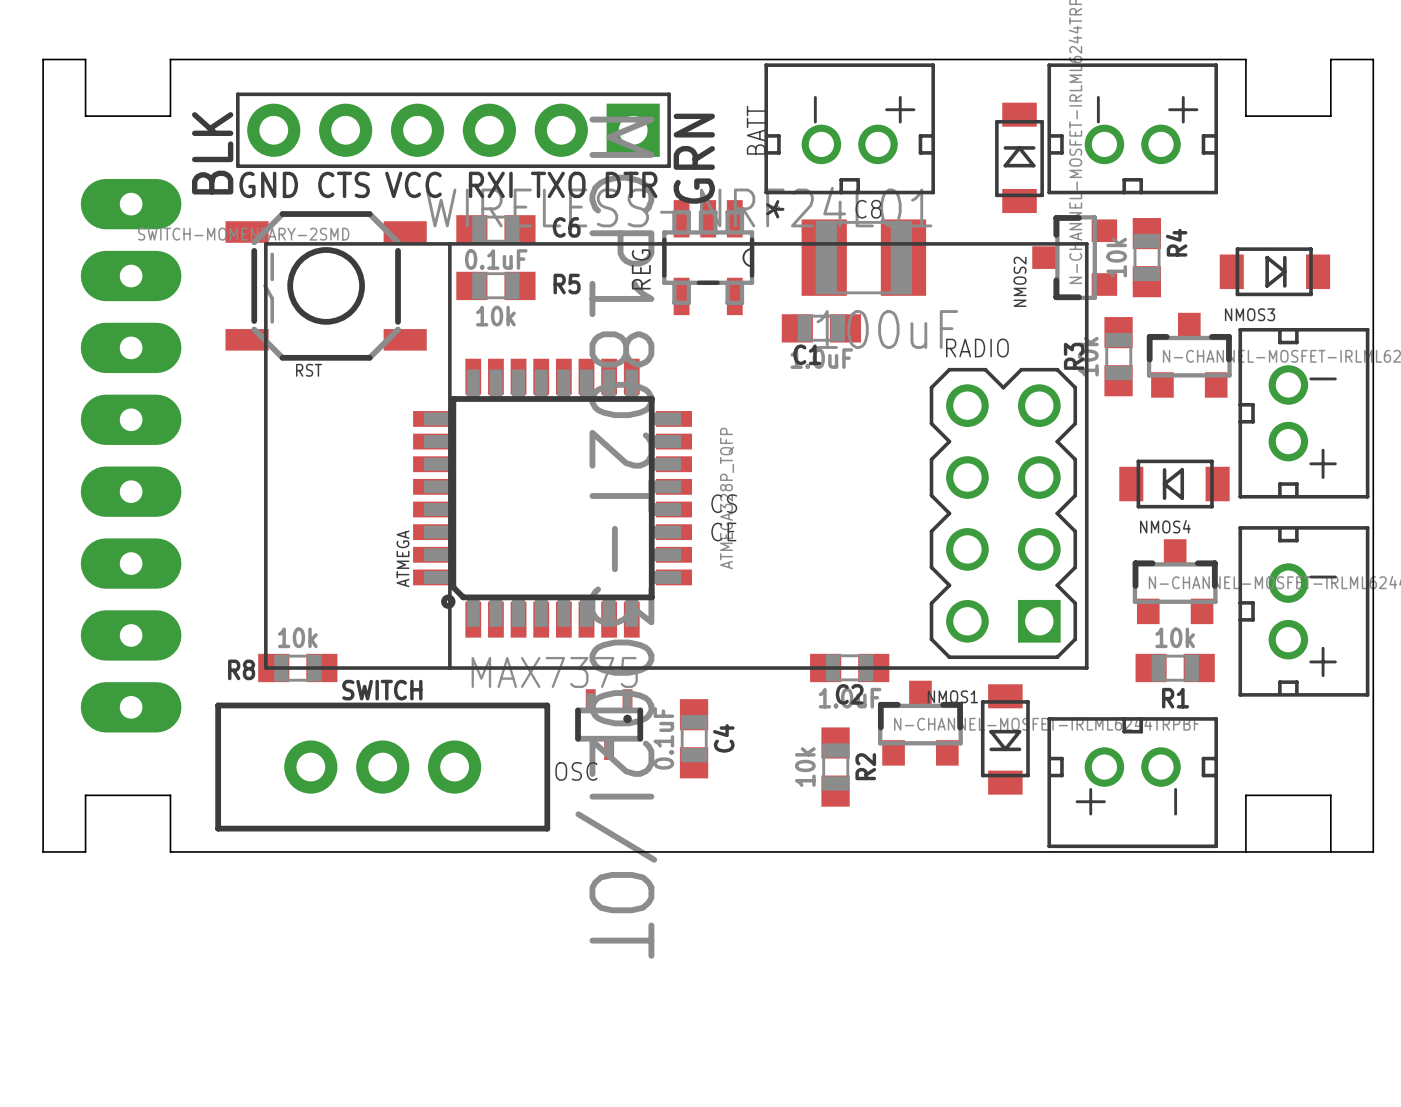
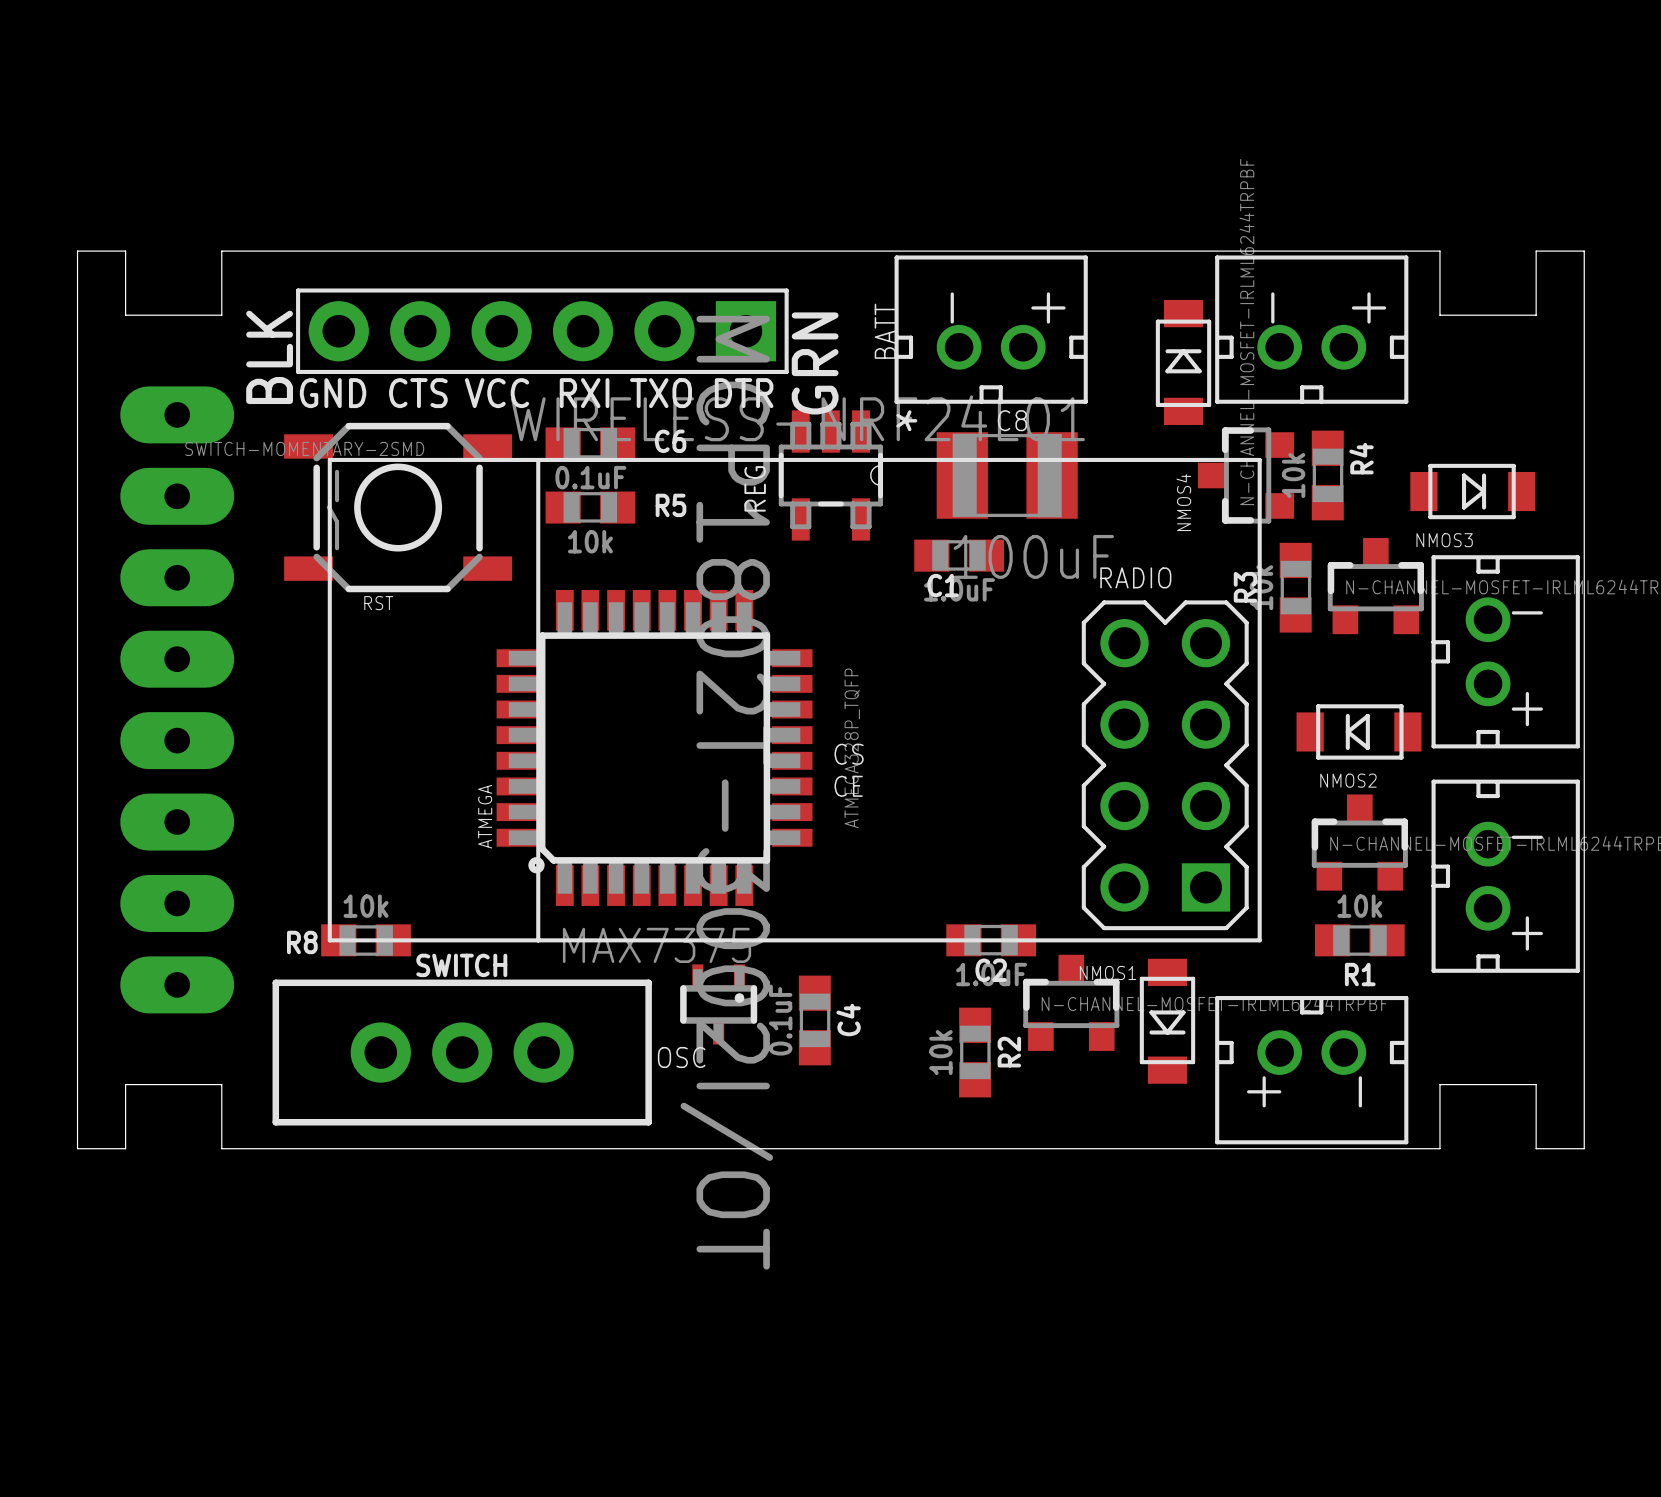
NMOS2 name: NMOS2 (1020, 281) -> NMOS4 (1183, 502)
NMOS4 name: NMOS4 (1165, 526) -> NMOS2 (1348, 780)
board edge: (1245, 851) (1330, 851) -> none

